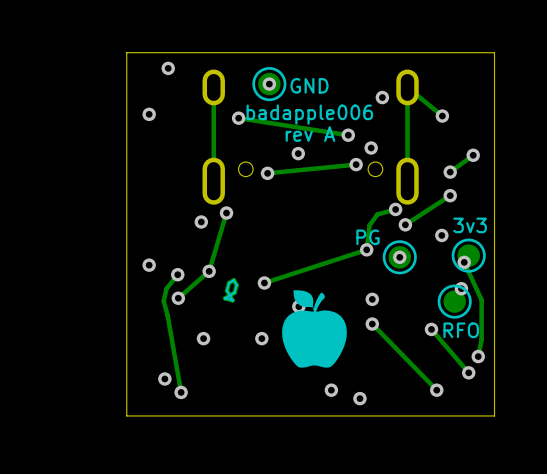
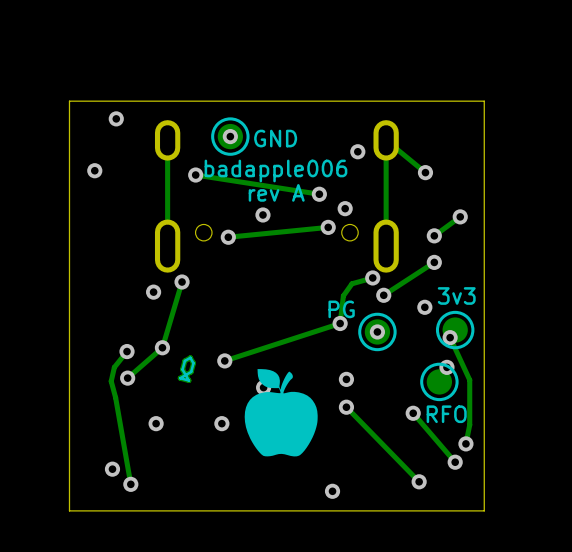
via: (149, 265) -> none
via: (331, 390) -> none

